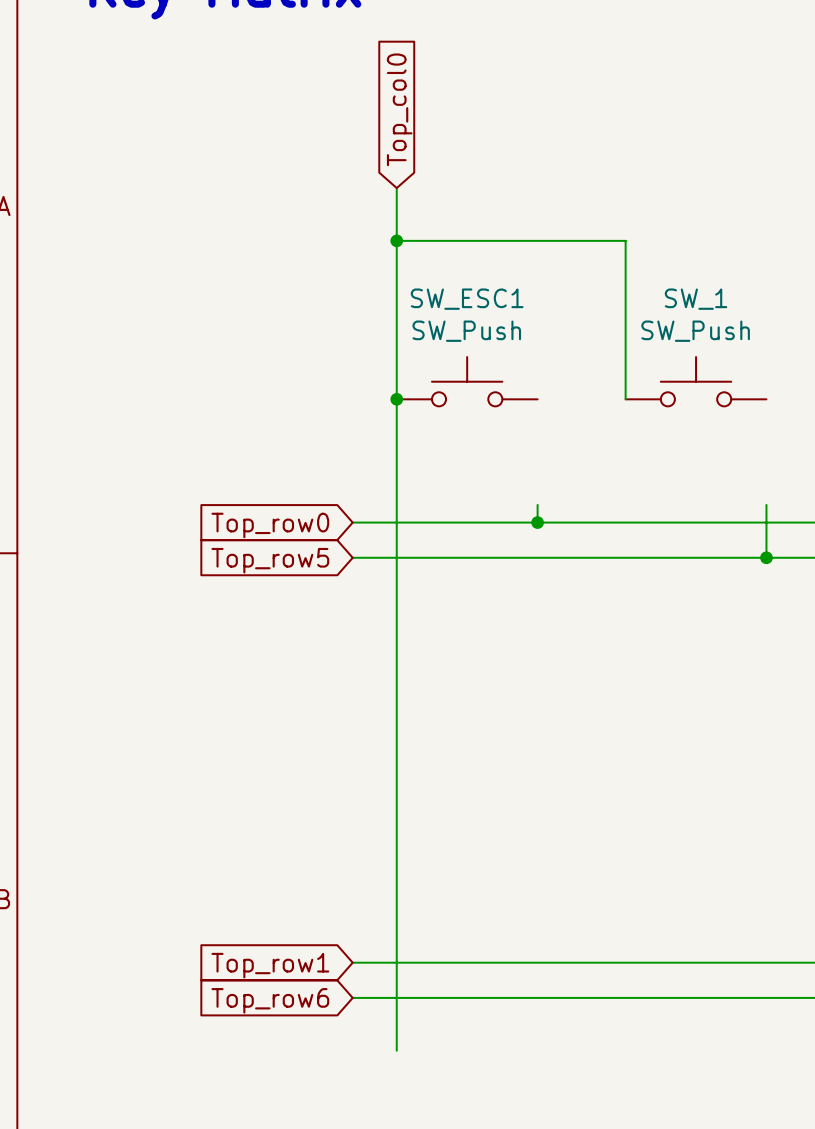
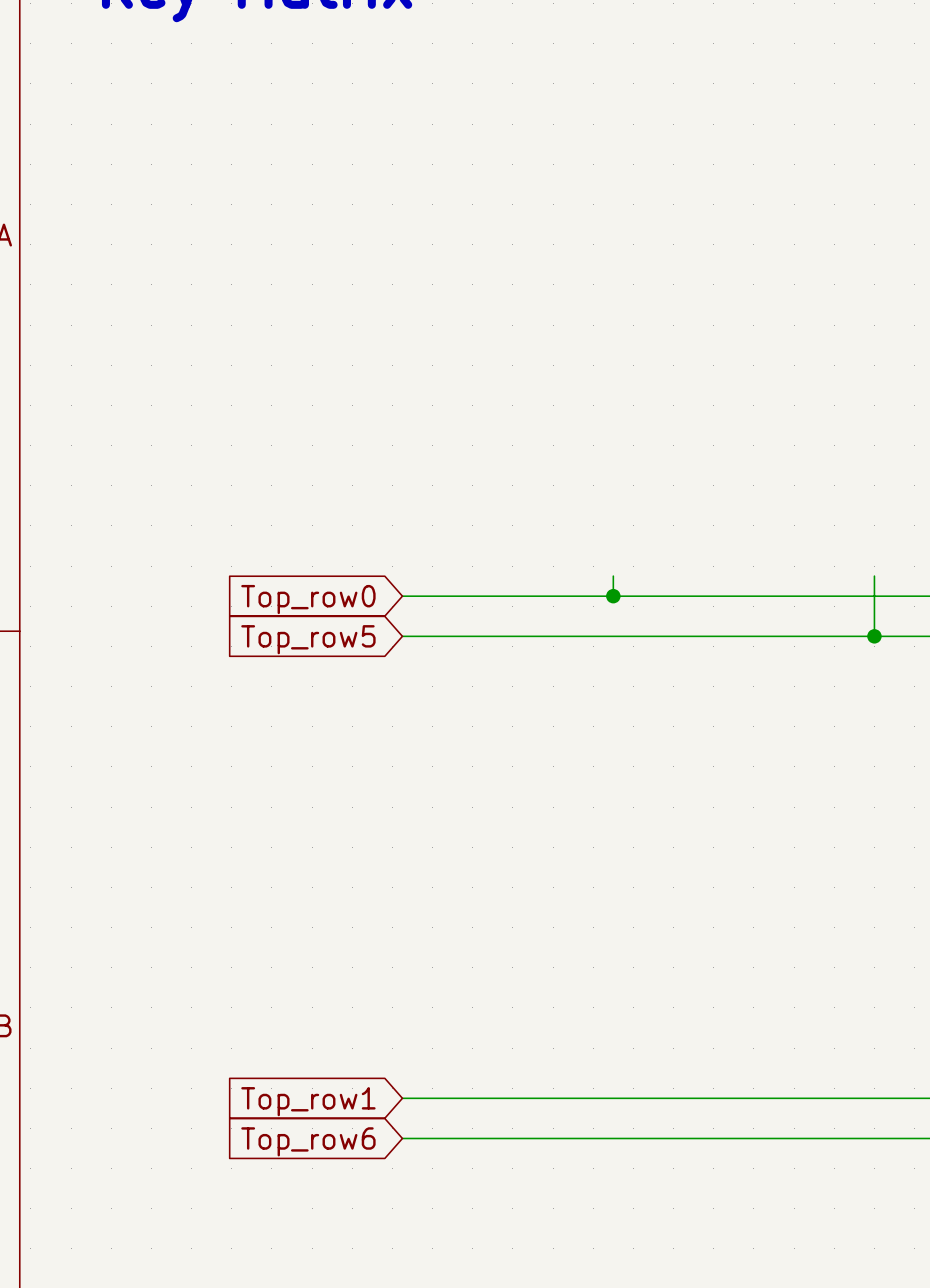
global label: Top_col0 (399, 109) -> none
wire: (396, 188) (396, 1050) -> none
wire: (396, 240) (625, 240) (625, 399) -> none
junction: (396, 240) -> none
SW_ESC1: SW_Push (467, 381) -> none
SW_1: SW_Push (696, 381) -> none
junction: (396, 399) -> none

